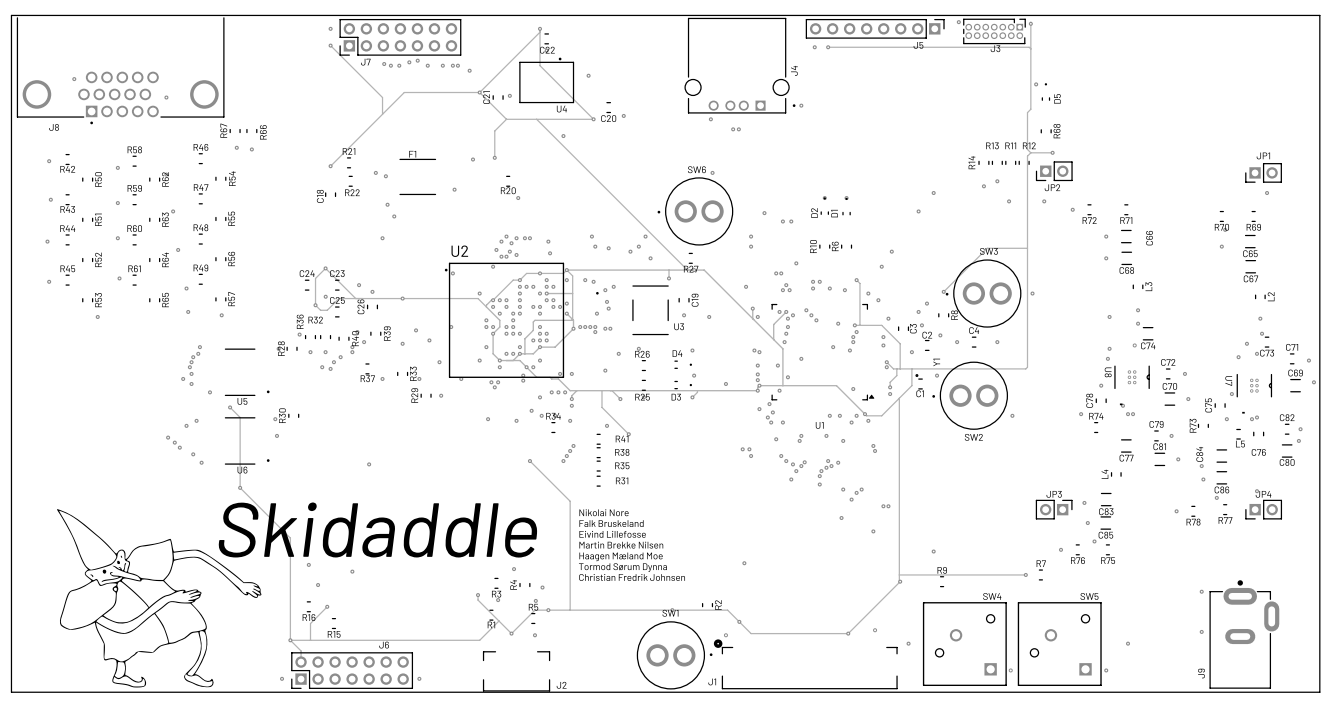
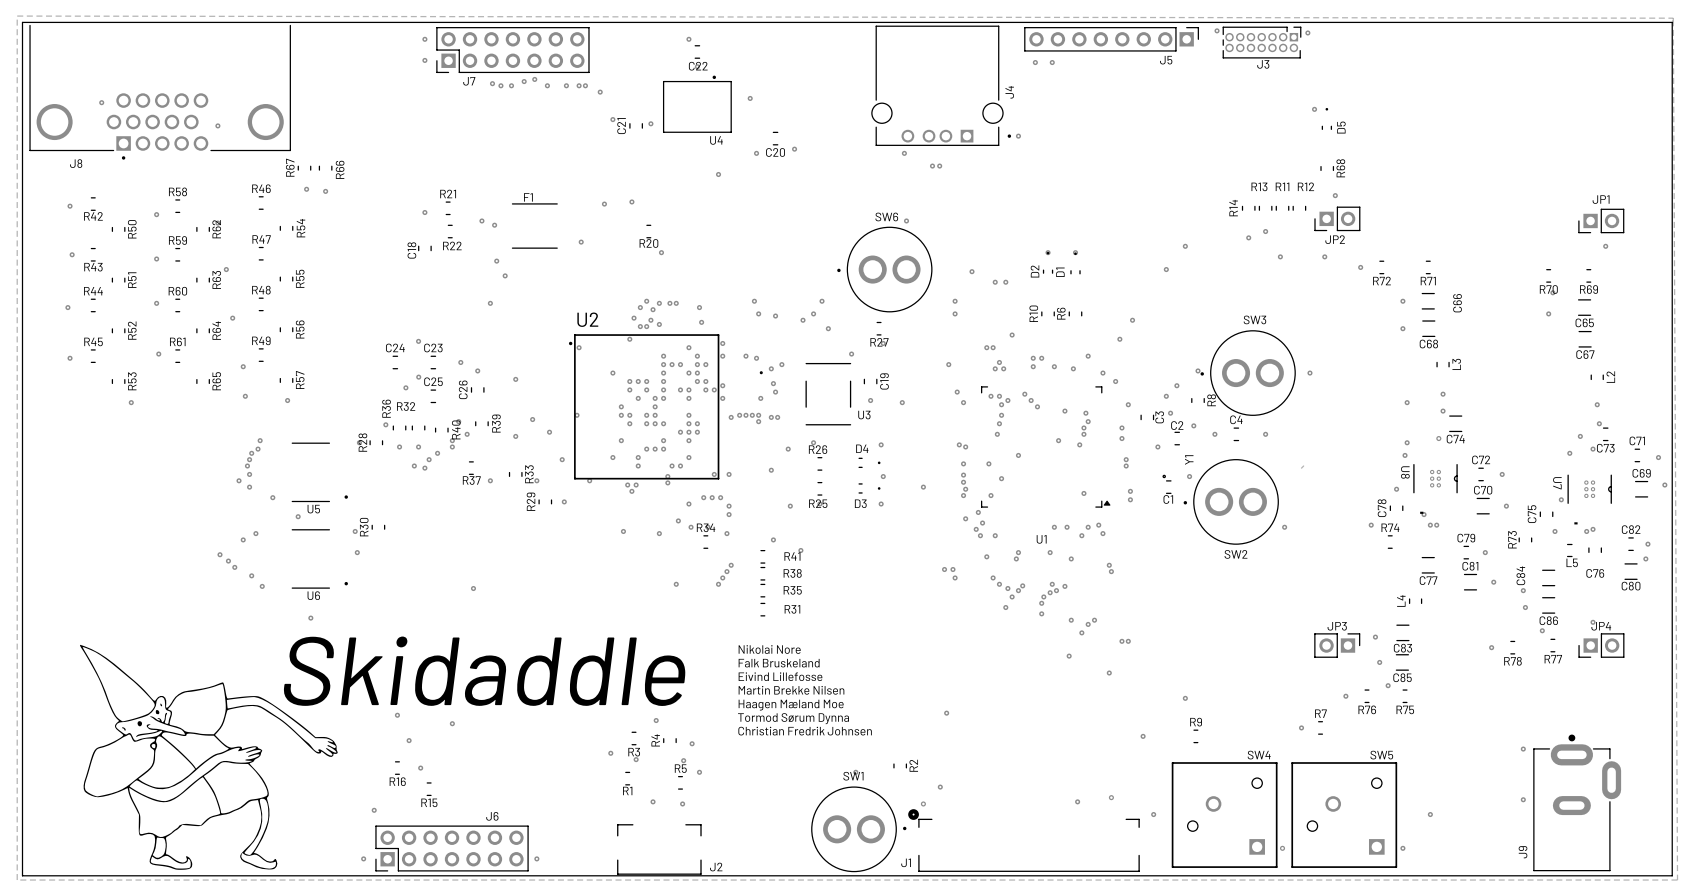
zone outline: none -> (1673, 20) (1677, 880) (17, 880) (17, 16) (1673, 18) (1673, 22)
track: (1030, 22) (1030, 109) (1027, 112) (1027, 149) (1030, 152) -> none
track: (540, 28) (540, 65) (593, 119) (506, 119) -> none
track: (540, 32) (479, 92) -> none
track: (330, 45) (382, 97) (382, 114) -> none
track: (828, 47) (1029, 47) (1030, 48) -> none
track: (479, 92) (506, 119) -> none
track: (479, 92) (404, 92) (330, 166) -> none
track: (506, 119) (494, 131) (494, 157) -> none
track: (536, 119) (687, 270) (690, 270) -> none
track: (1030, 152) (1027, 156) (1027, 367) -> none
track: (1030, 152) (1052, 152) -> none
track: (1027, 248) (987, 248) (943, 291) -> none
track: (566, 270) (572, 275) (572, 319) (534, 320) (533, 330) (524, 338) (524, 353) -> none
track: (566, 270) (563, 273) (526, 273) (519, 280) (513, 280) (486, 306) -> none
track: (566, 270) (704, 270) (782, 348) (782, 385) -> none
track: (668, 270) (668, 278) -> none
track: (856, 280) (859, 283) (859, 325) -> none
track: (546, 293) (572, 293) -> none
track: (355, 298) (325, 268) (315, 278) (315, 305) (320, 310) (327, 310) (338, 298) (478, 298) (486, 306) -> none
track: (486, 306) (499, 320) (499, 327) (493, 333) (493, 353) (499, 360) (519, 360) (536, 377) (558, 378) (570, 390) (757, 390) (759, 385) (836, 385) (866, 415) (881, 415) (911, 385) (911, 368) -> none
track: (752, 308) (752, 318) -> none
track: (786, 311) (773, 324) (773, 339) -> none
track: (566, 313) (573, 320) (573, 328) (555, 347) (540, 347) (533, 353) (519, 353) (513, 360) -> none
track: (854, 325) (881, 325) (900, 343) (900, 368) -> none
track: (886, 362) (893, 368) (1025, 368) -> none
track: (896, 368) (896, 375) (890, 382) (890, 387) -> none
track: (576, 390) (571, 395) (571, 399) -> none
track: (601, 390) (601, 407) (628, 434) -> none
track: (610, 390) (620, 399) -> none
track: (697, 390) (692, 397) -> none
track: (899, 398) (899, 582) (848, 633) (751, 633) (727, 610) (534, 610) (511, 633) (478, 600) (478, 595) -> none
track: (230, 407) (240, 417) (240, 487) (290, 538) (290, 640) -> none
track: (529, 461) (570, 501) (570, 610) -> none
track: (899, 574) (1025, 574) -> none
track: (327, 606) (310, 623) (310, 640) -> none
track: (498, 621) (479, 640) (290, 640) -> none
track: (290, 640) (301, 650) (301, 662) -> none

